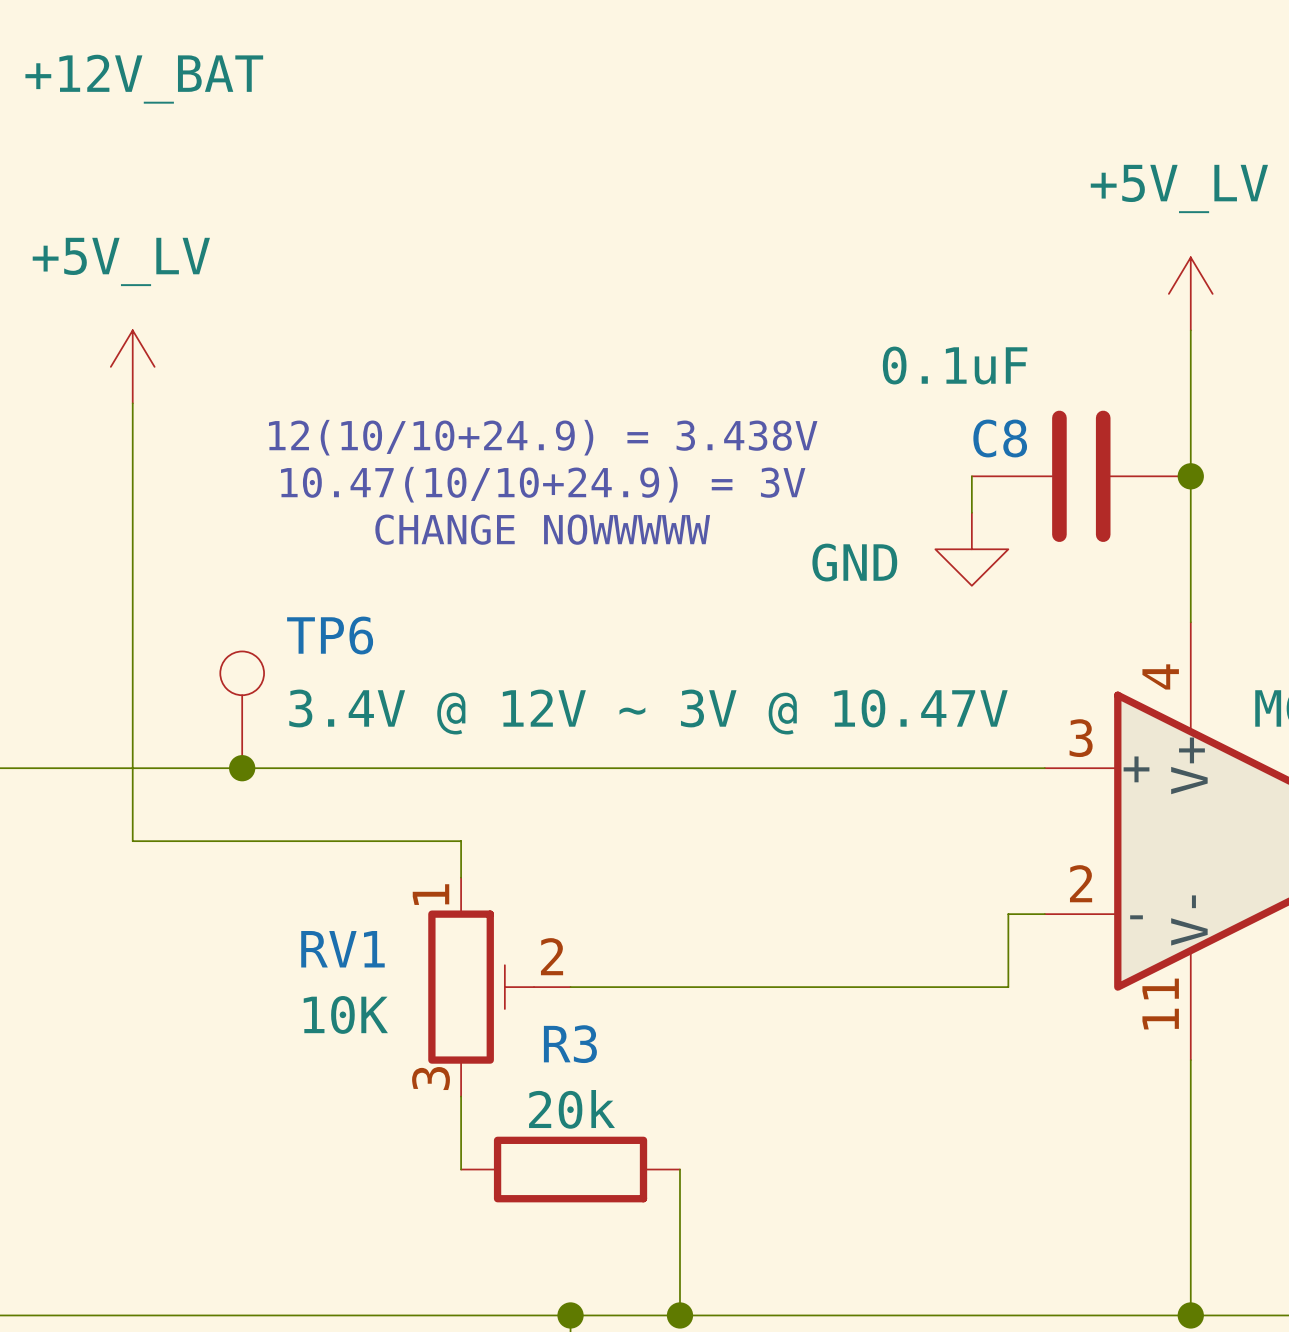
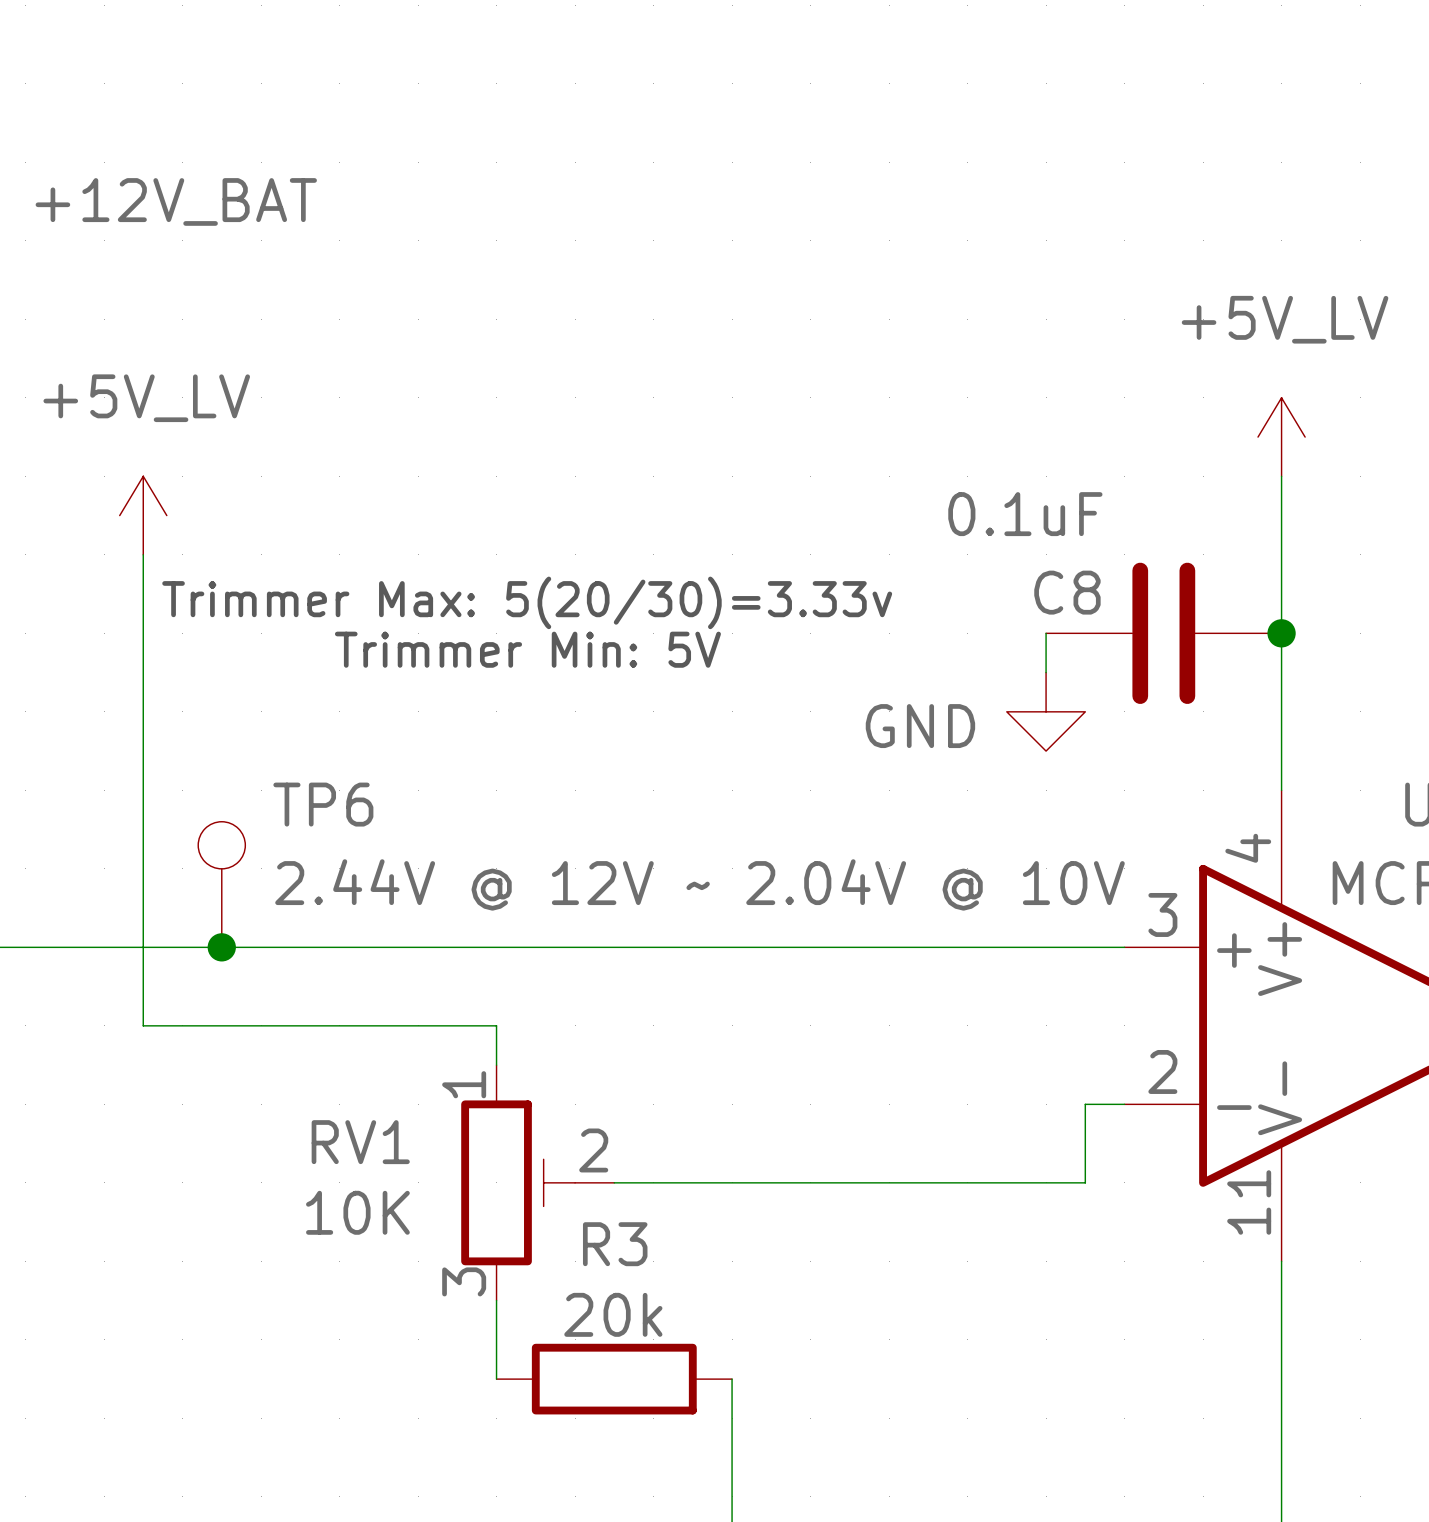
text: 12(10/10+24.9) = 3.438V (543, 437) -> none
text: none -> Trimmer Max: 5(20/30)=3.33v (527, 602)
text: 10.47(10/10+24.9) = 3V (543, 484) -> none
text: none -> Trimmer Min: 5V (527, 649)
text: CHANGE NOWWWWW (542, 529) -> none
TP6 position: (242, 709) -> (221, 884)
TP6 value: 3.4V @ 12V ~ 3V @ 10.47V (648, 712) -> 2.44V @ 12V ~ 2.04V @ 10V (700, 884)
junction position: (242, 768) -> (221, 947)

